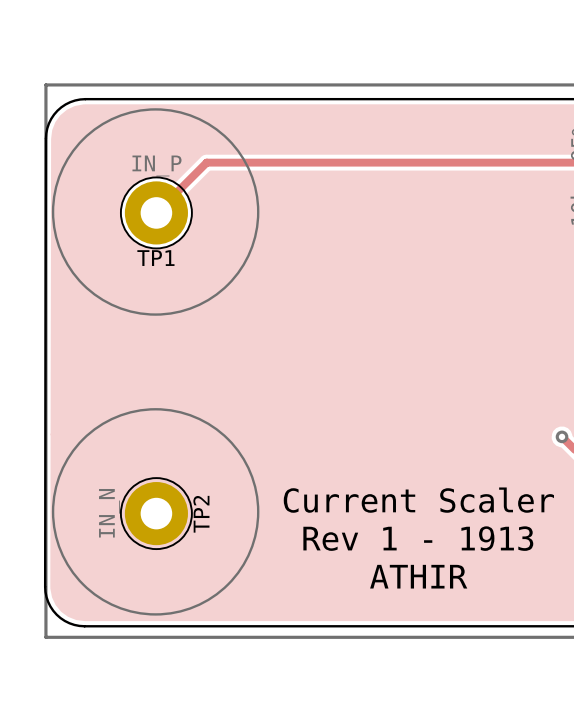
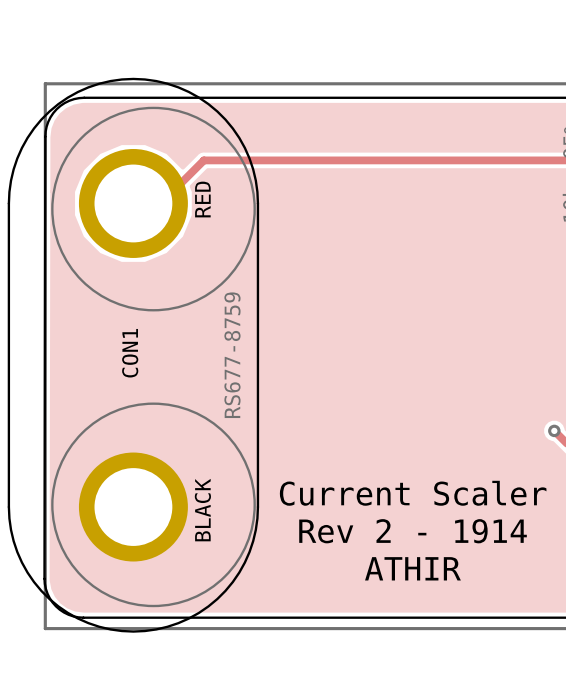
TP1: IN_P (156, 212) -> none
CON1: none -> RS677-8759 (133, 355)
TP2: IN_N (156, 513) -> none
text: Rev 1 - 1913 (418, 538) -> Rev 2 - 1914 (413, 531)

